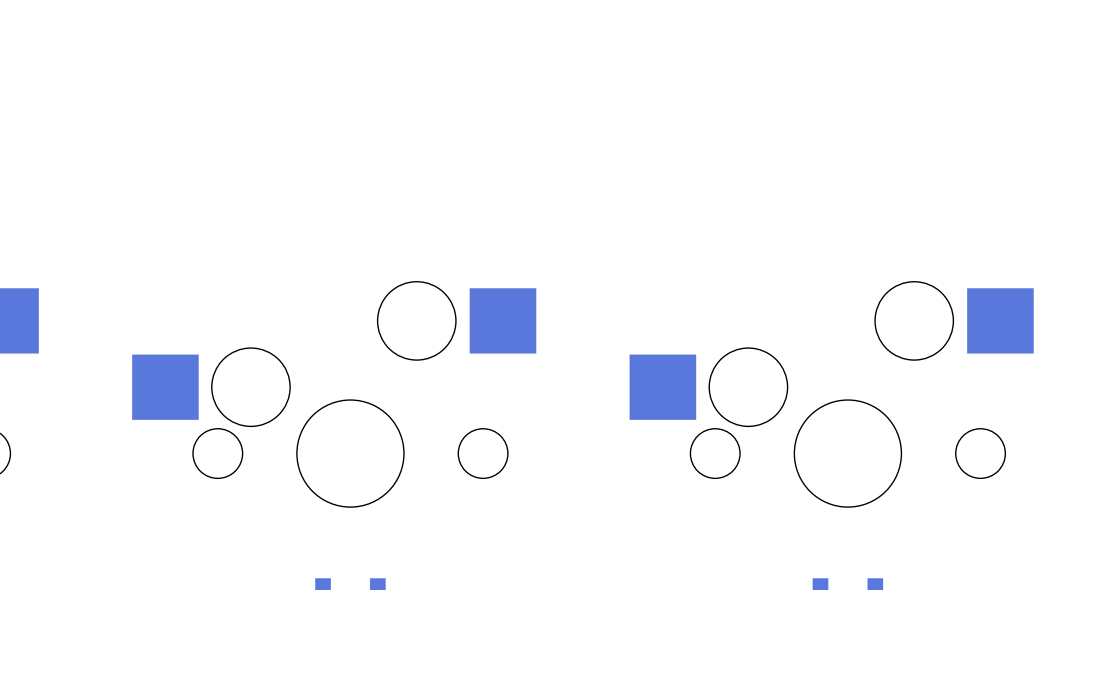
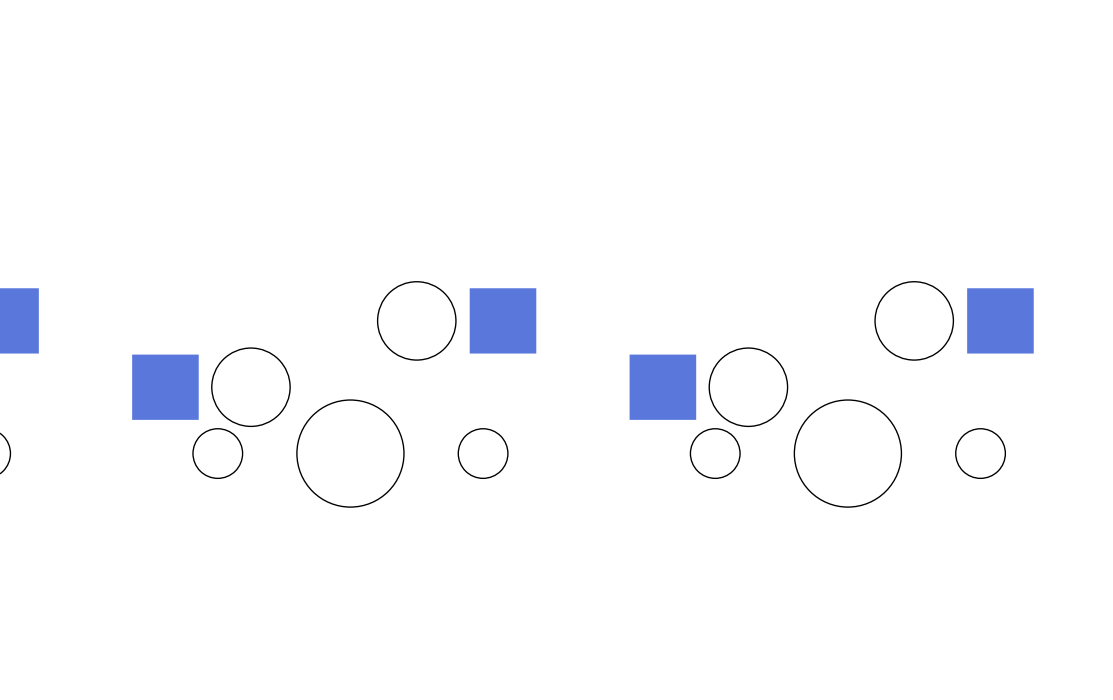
part: (350, 584) -> none
part: (847, 584) -> none

